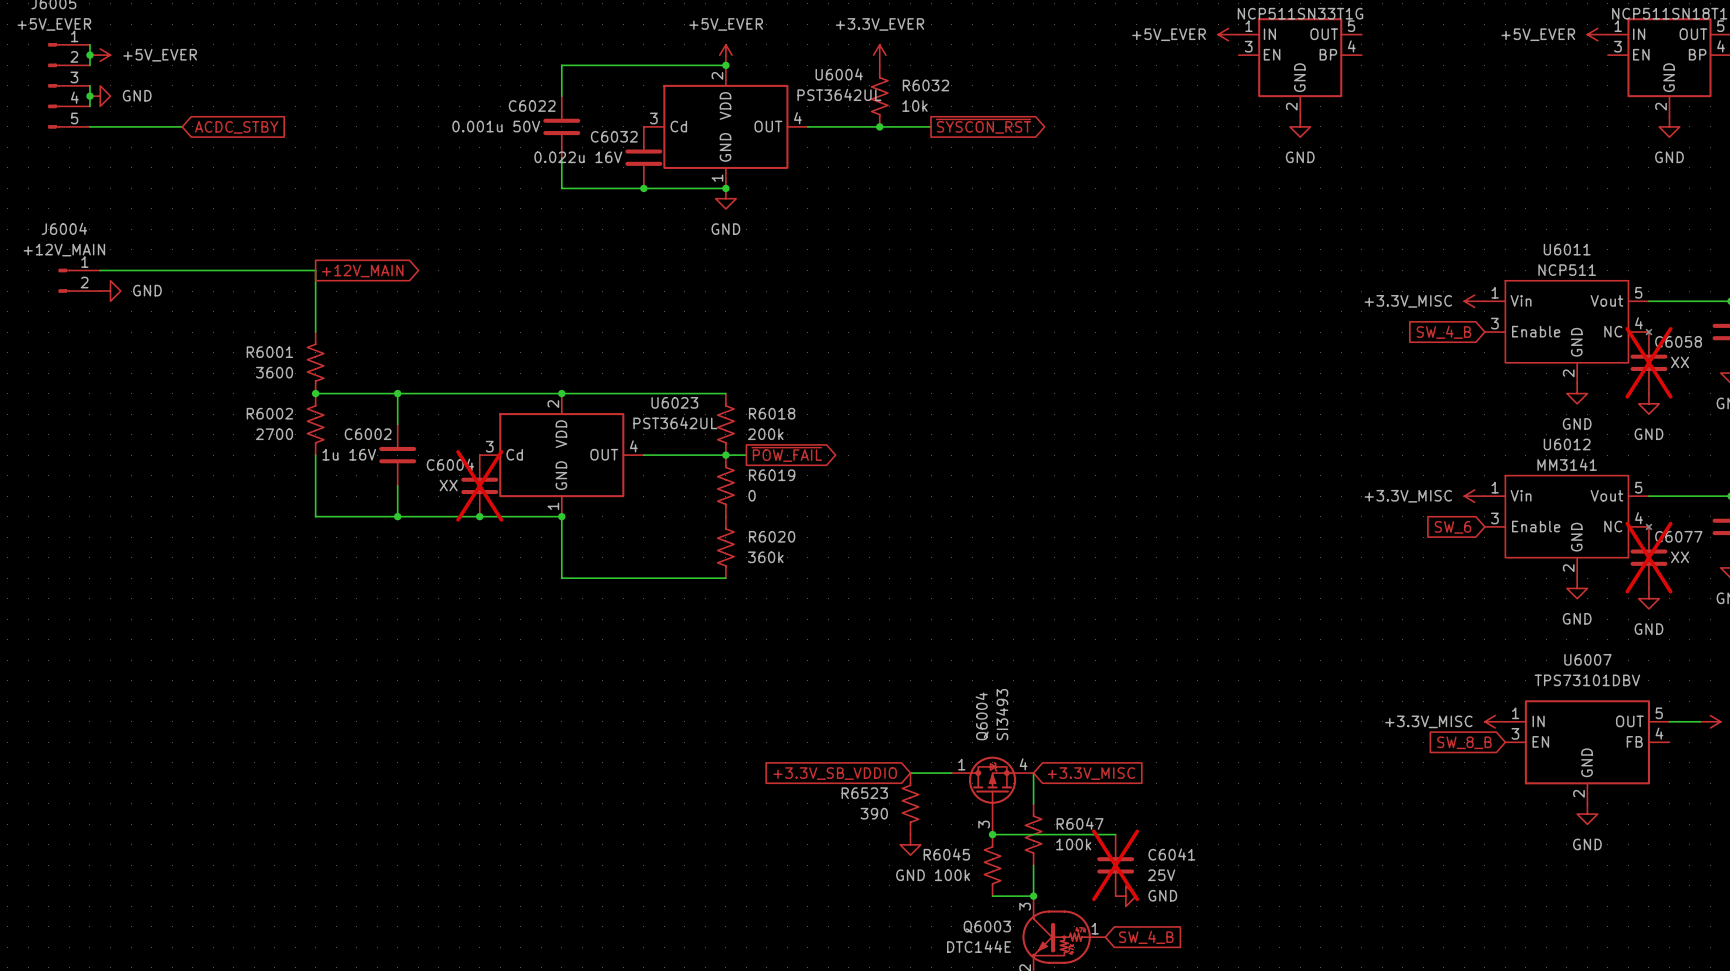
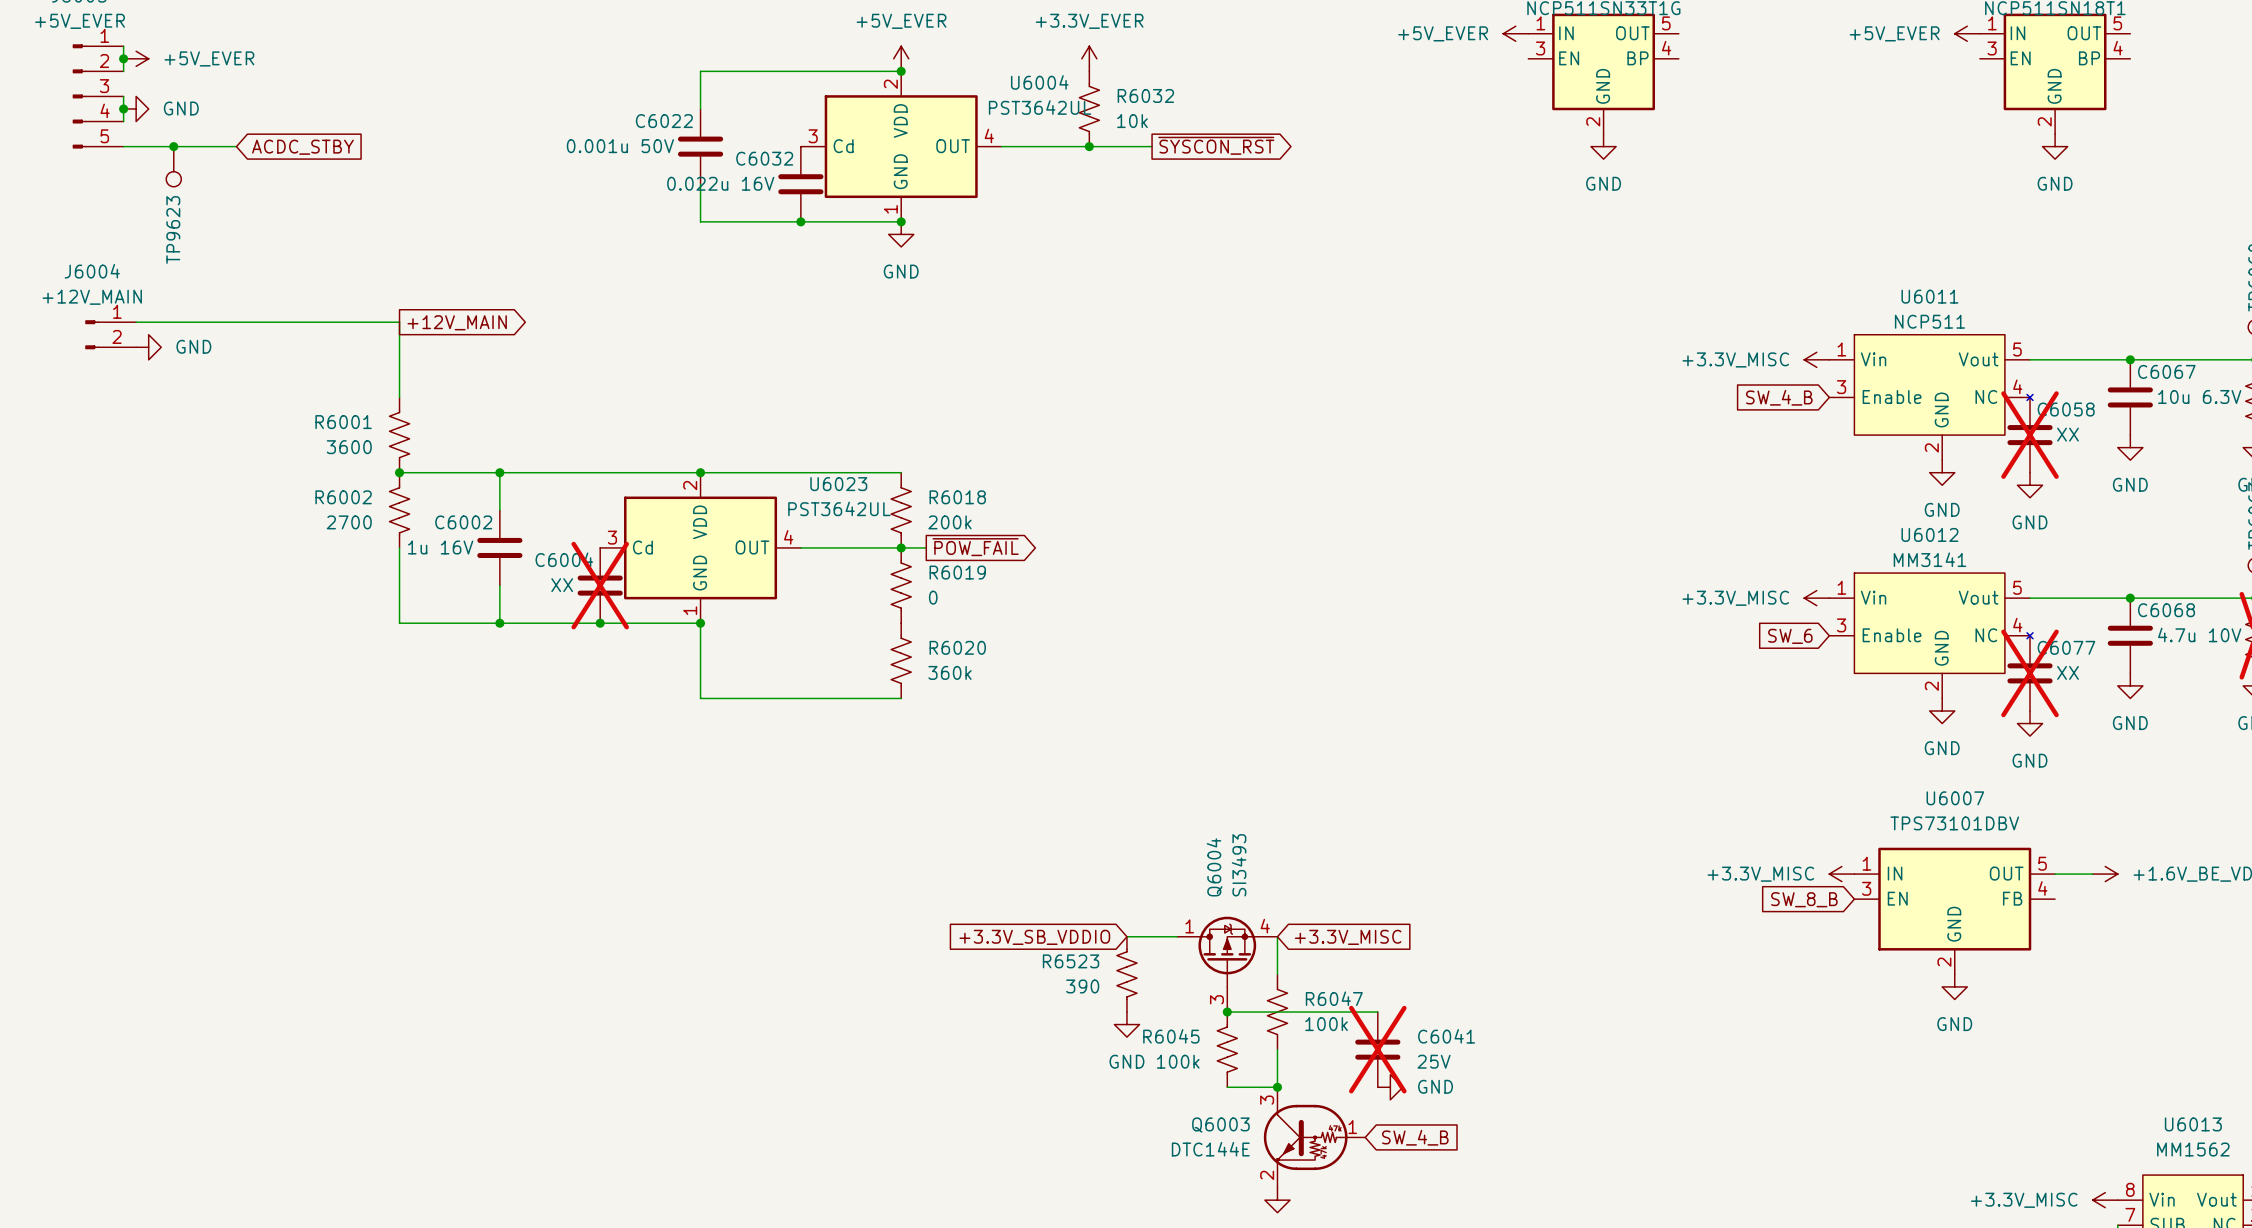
junction: none -> (173, 146)
TP9623: none -> (173, 166)

